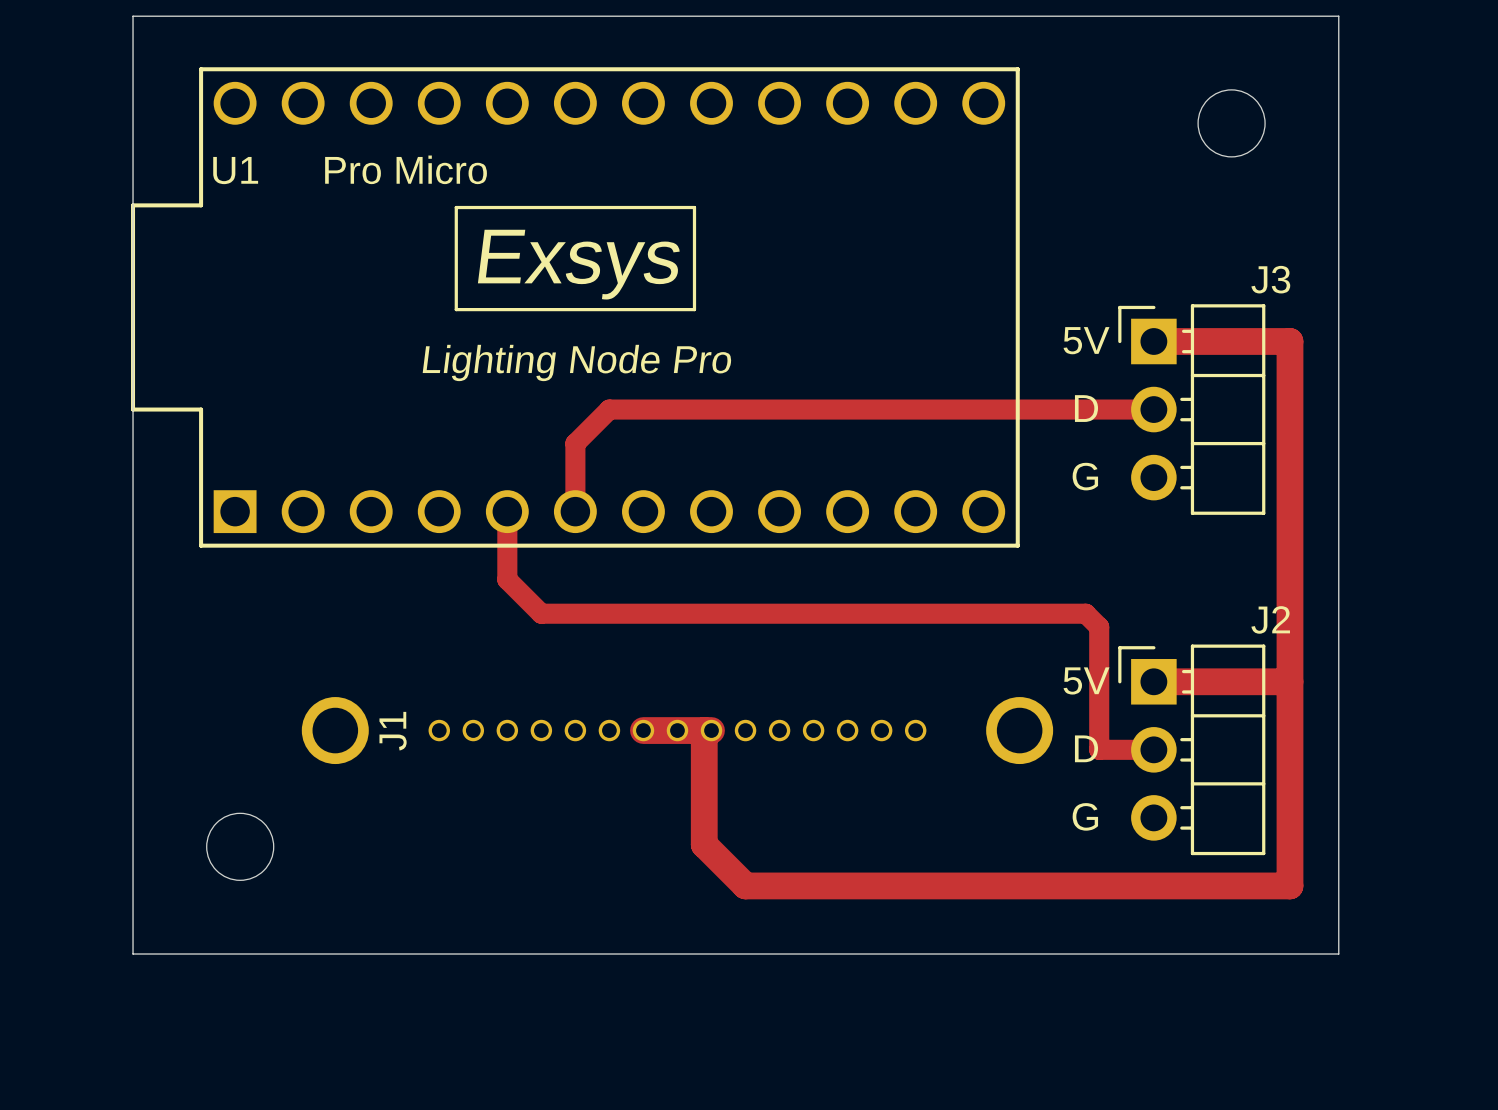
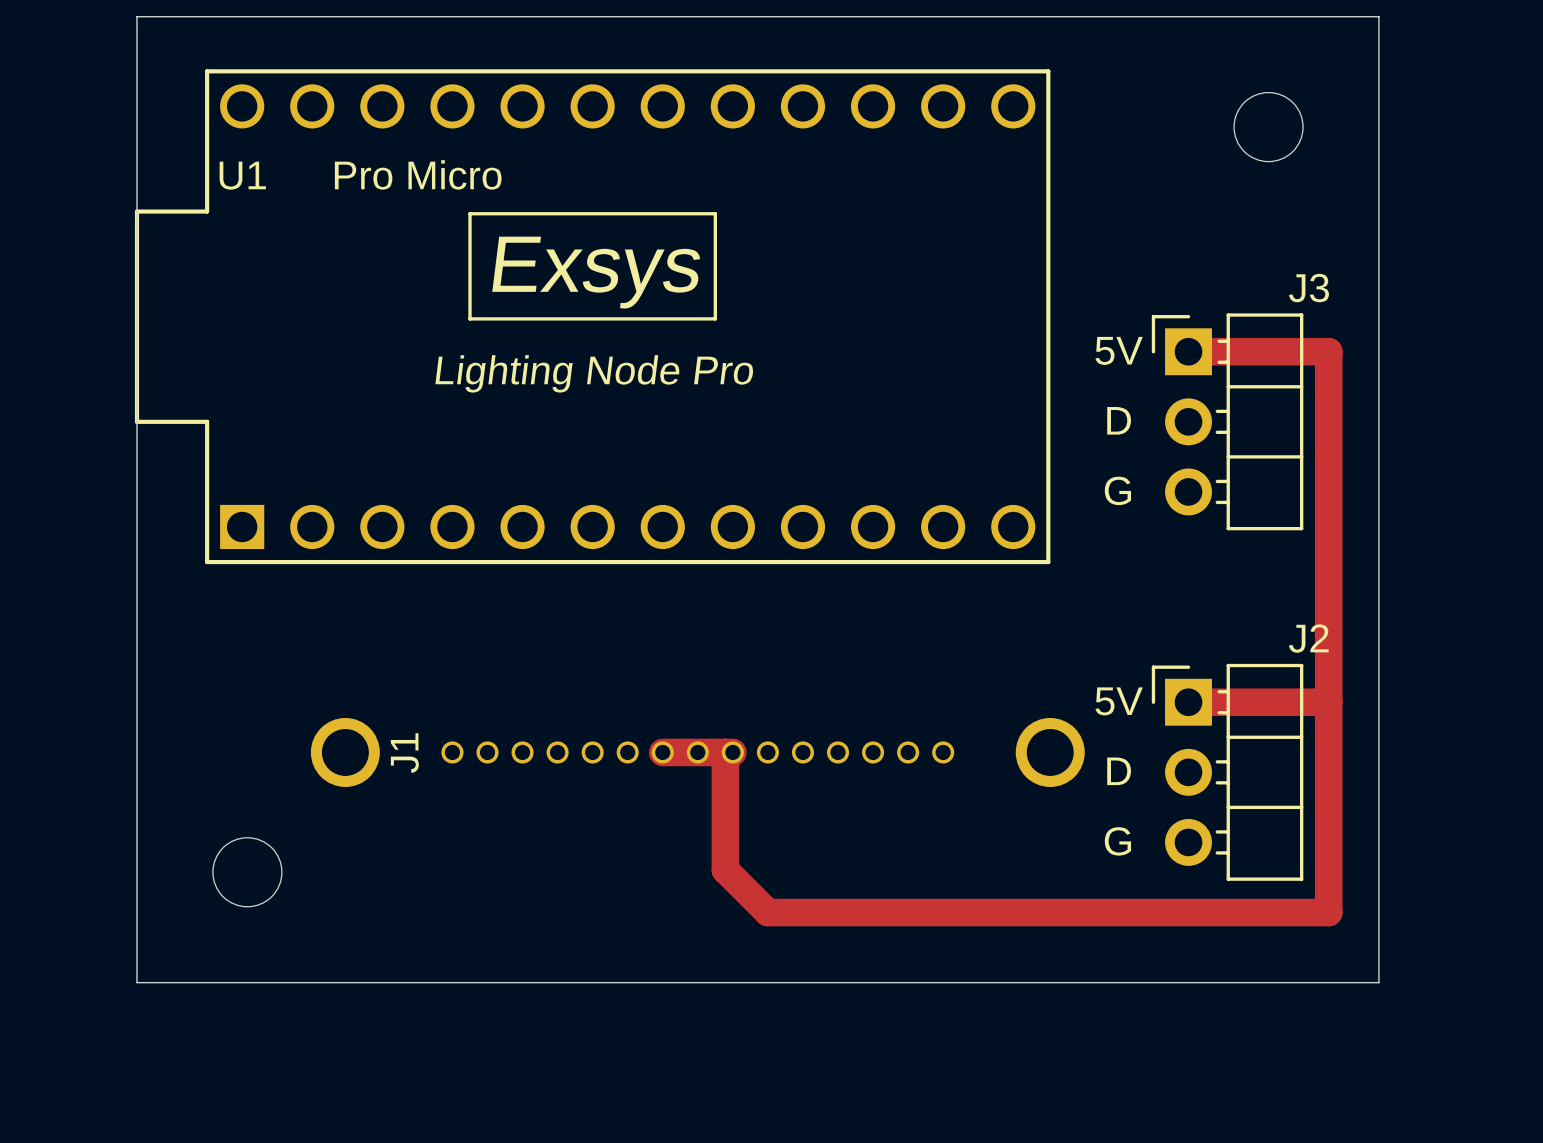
track: (1153, 409) (609, 409) (575, 443) (575, 511) -> none
track: (507, 511) (507, 579) (541, 613) (1085, 613) (1099, 627) (1099, 749) (1153, 749) -> none

